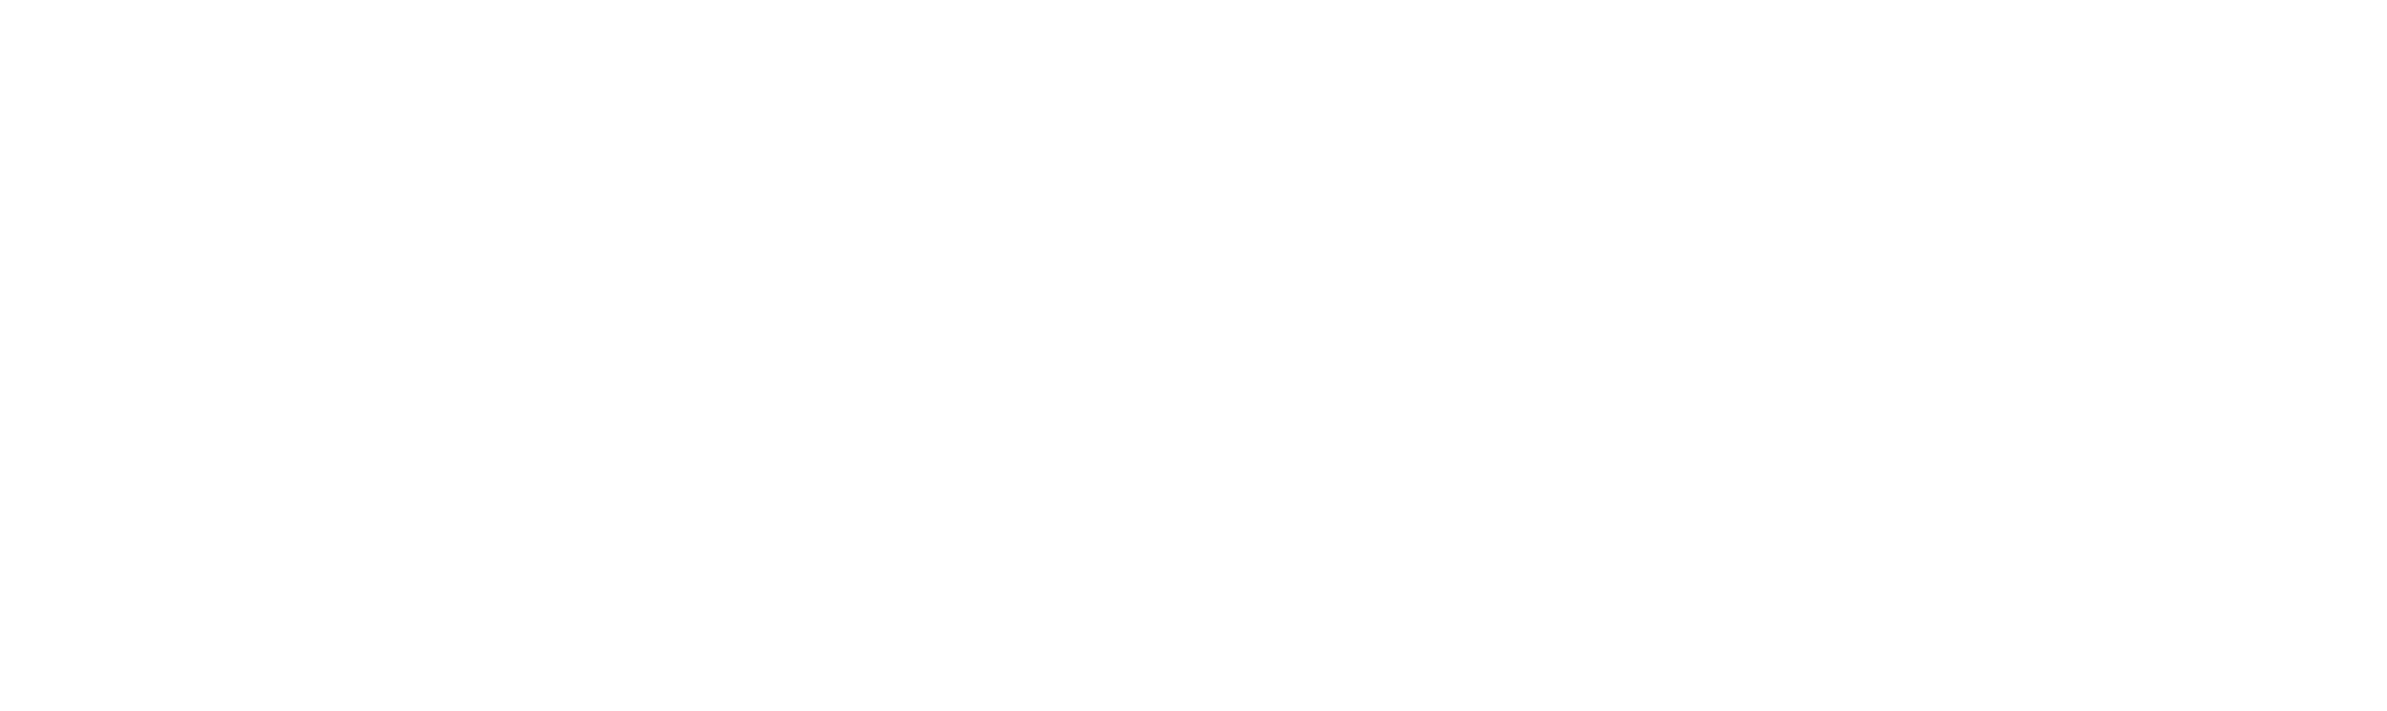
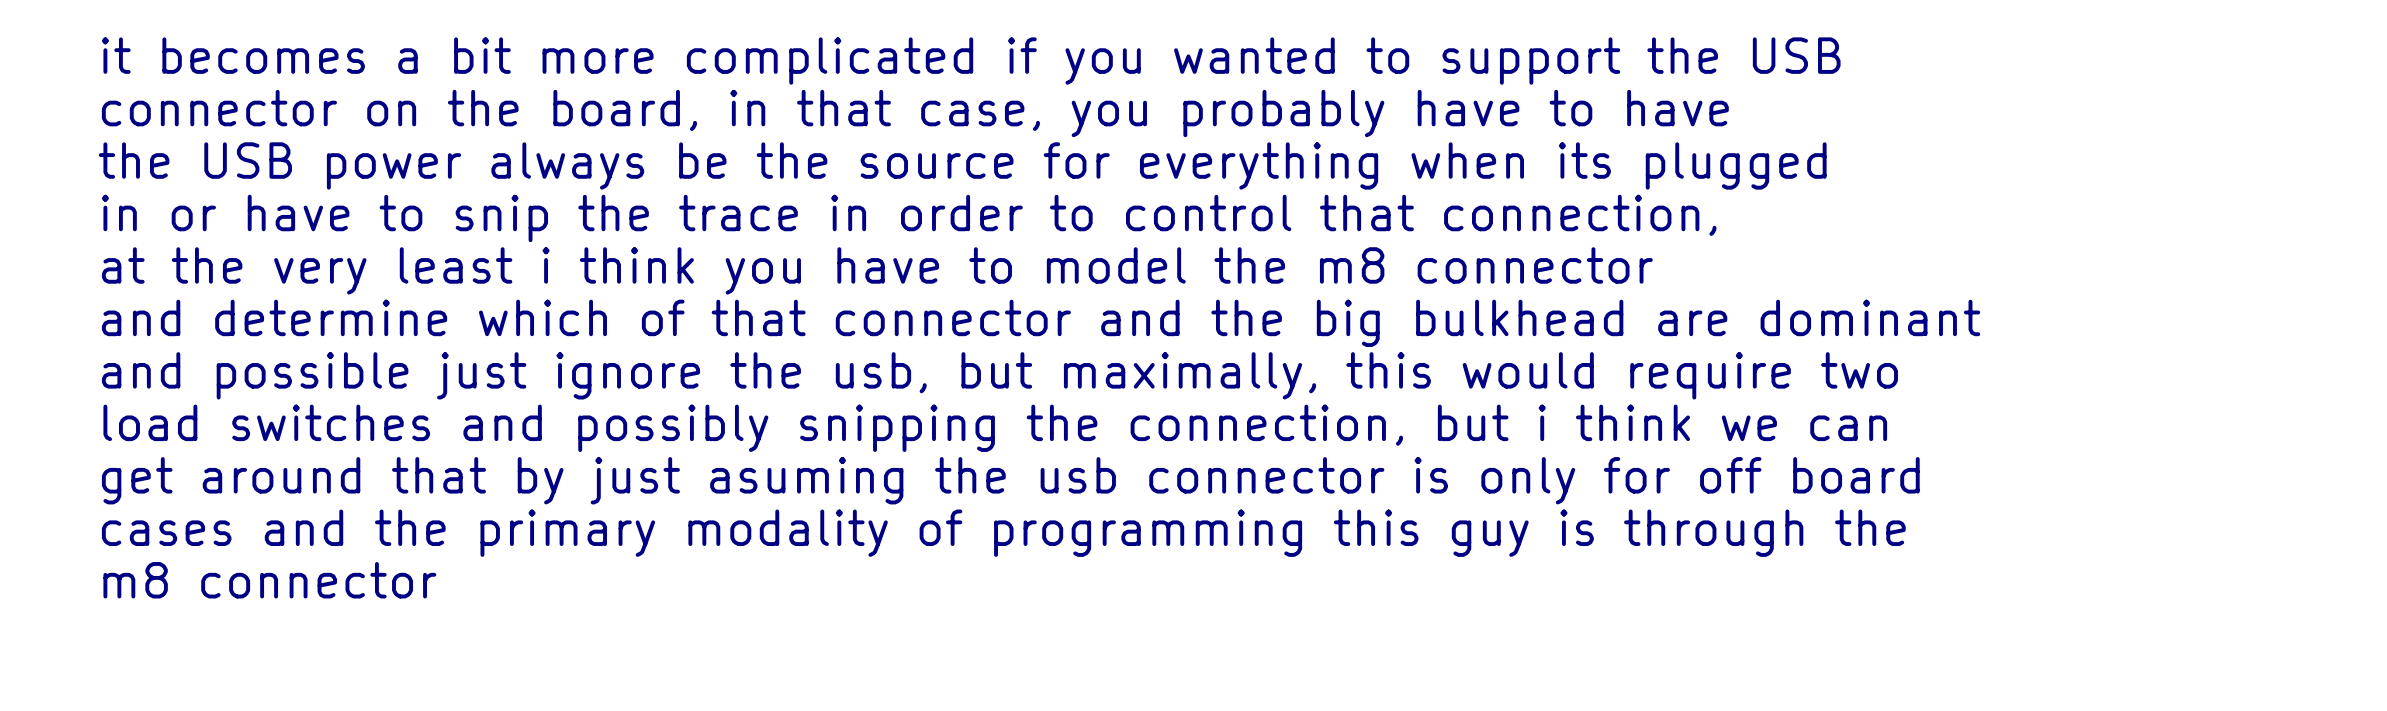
text: none -> it becomes a bit more complicated if you wanted to support the USB (971, 61)
text: none -> connector on the board, in that case, you probably have to have (915, 113)
text: none -> the USB power always be the source for everything when its plugged (962, 165)
text: none -> in or have to snip the trace in order to control that connection, (909, 218)
text: none -> at the very least i think you have to model the m8 connector (877, 270)
text: none -> and determine which of that connector and the big bulkhead are dominant (1041, 323)
text: none -> and possible just ignore the usb, but maximally, this would require two (999, 375)
text: none -> load switches and possibly snipping the connection, but i think we can (995, 428)
text: none -> get around that by just asuming the usb connector is only for off board (1010, 480)
text: none -> cases and the primary modality of programming this guy is through the (1003, 533)
text: none -> m8 connector (269, 580)

